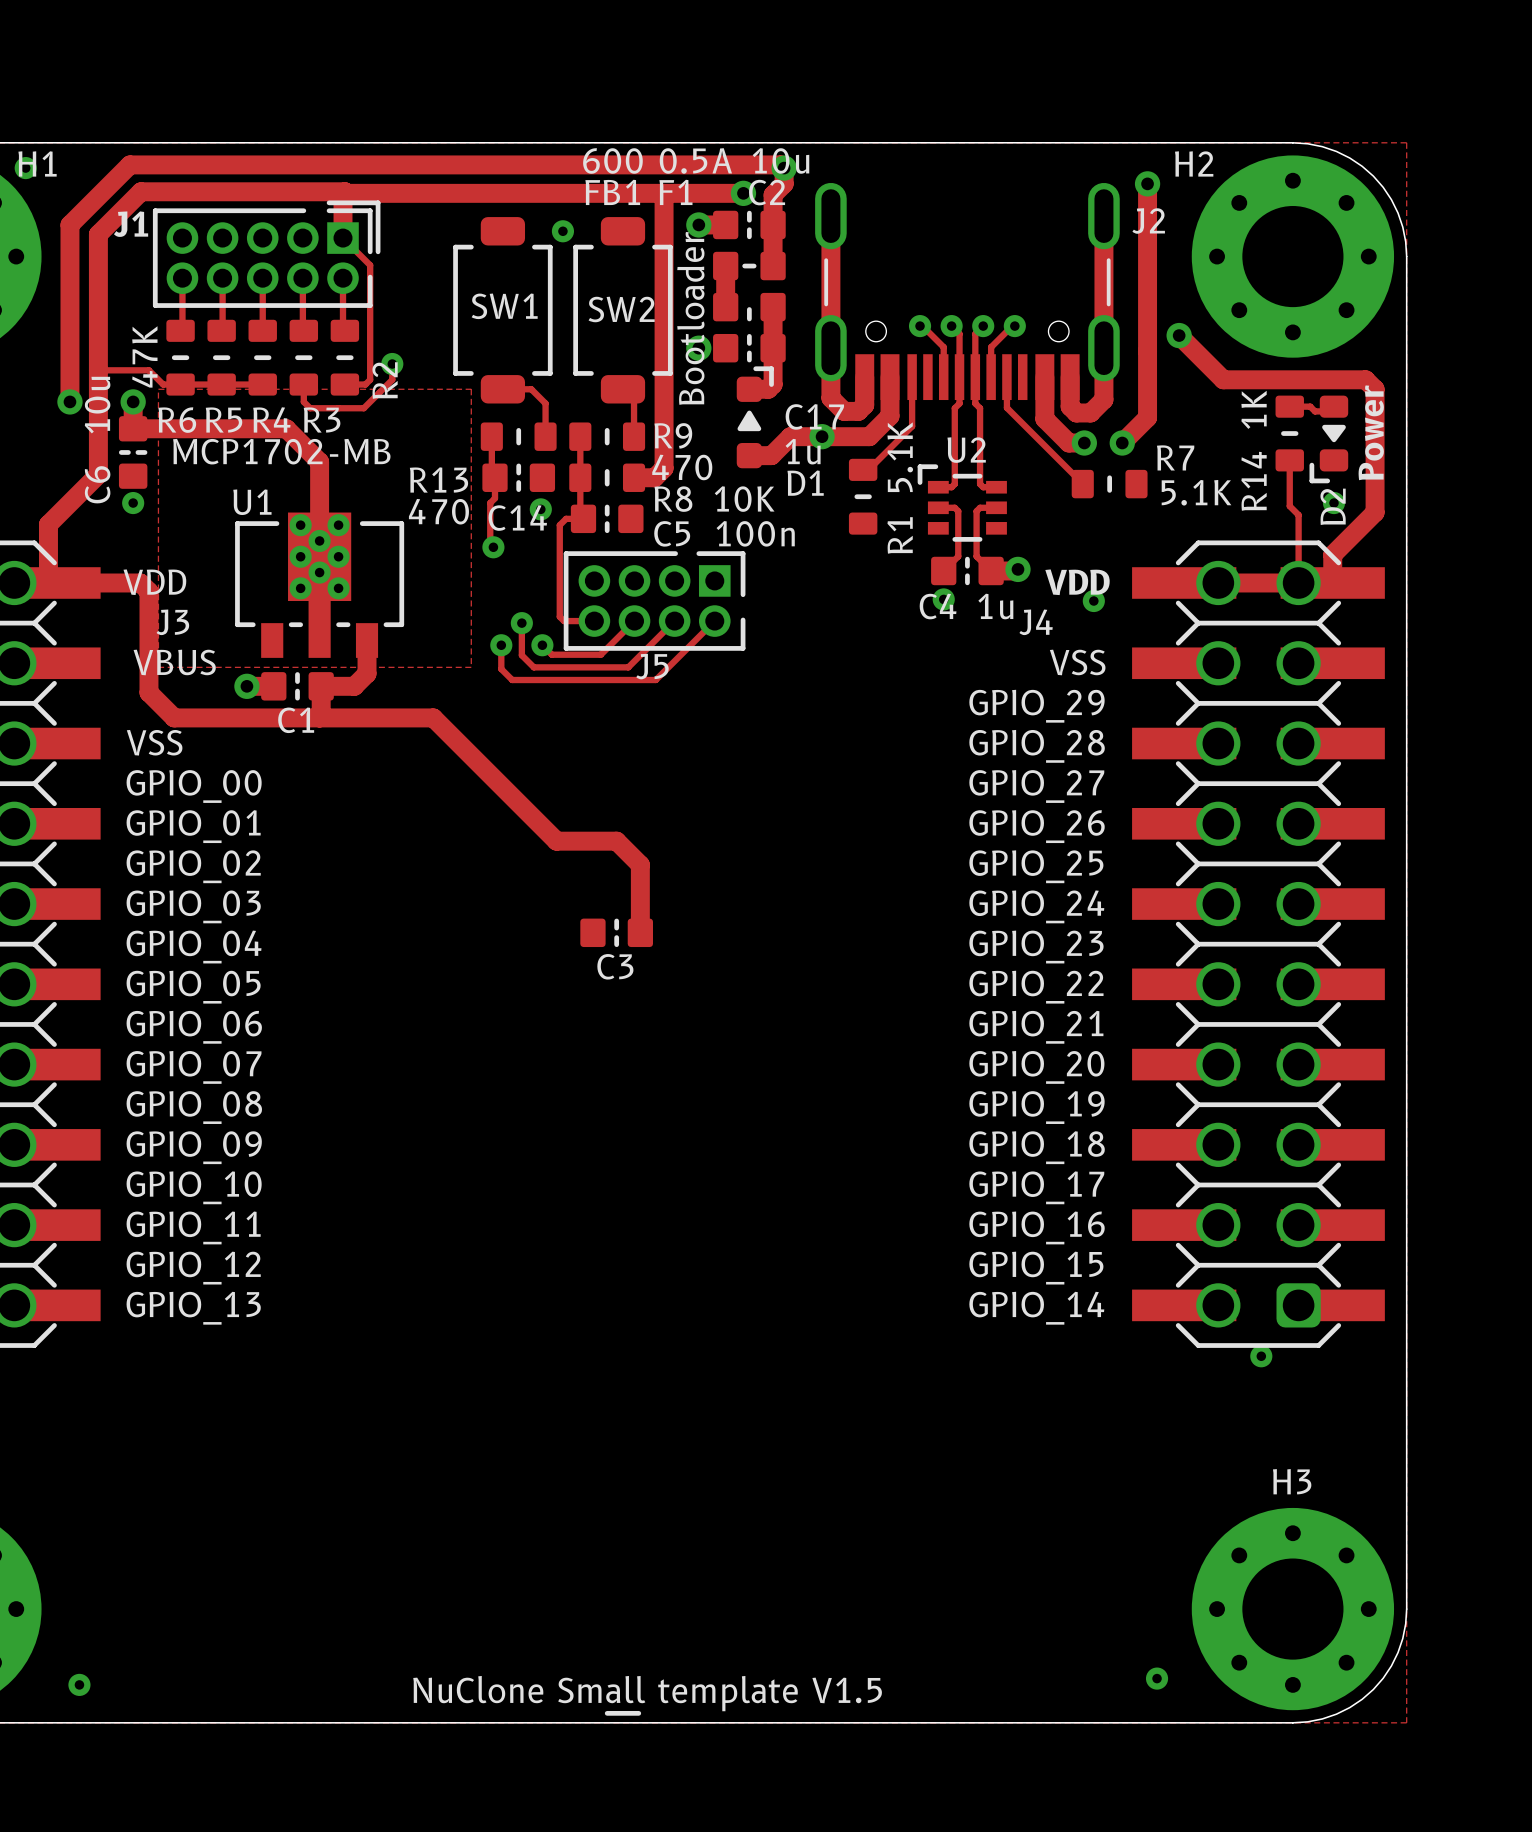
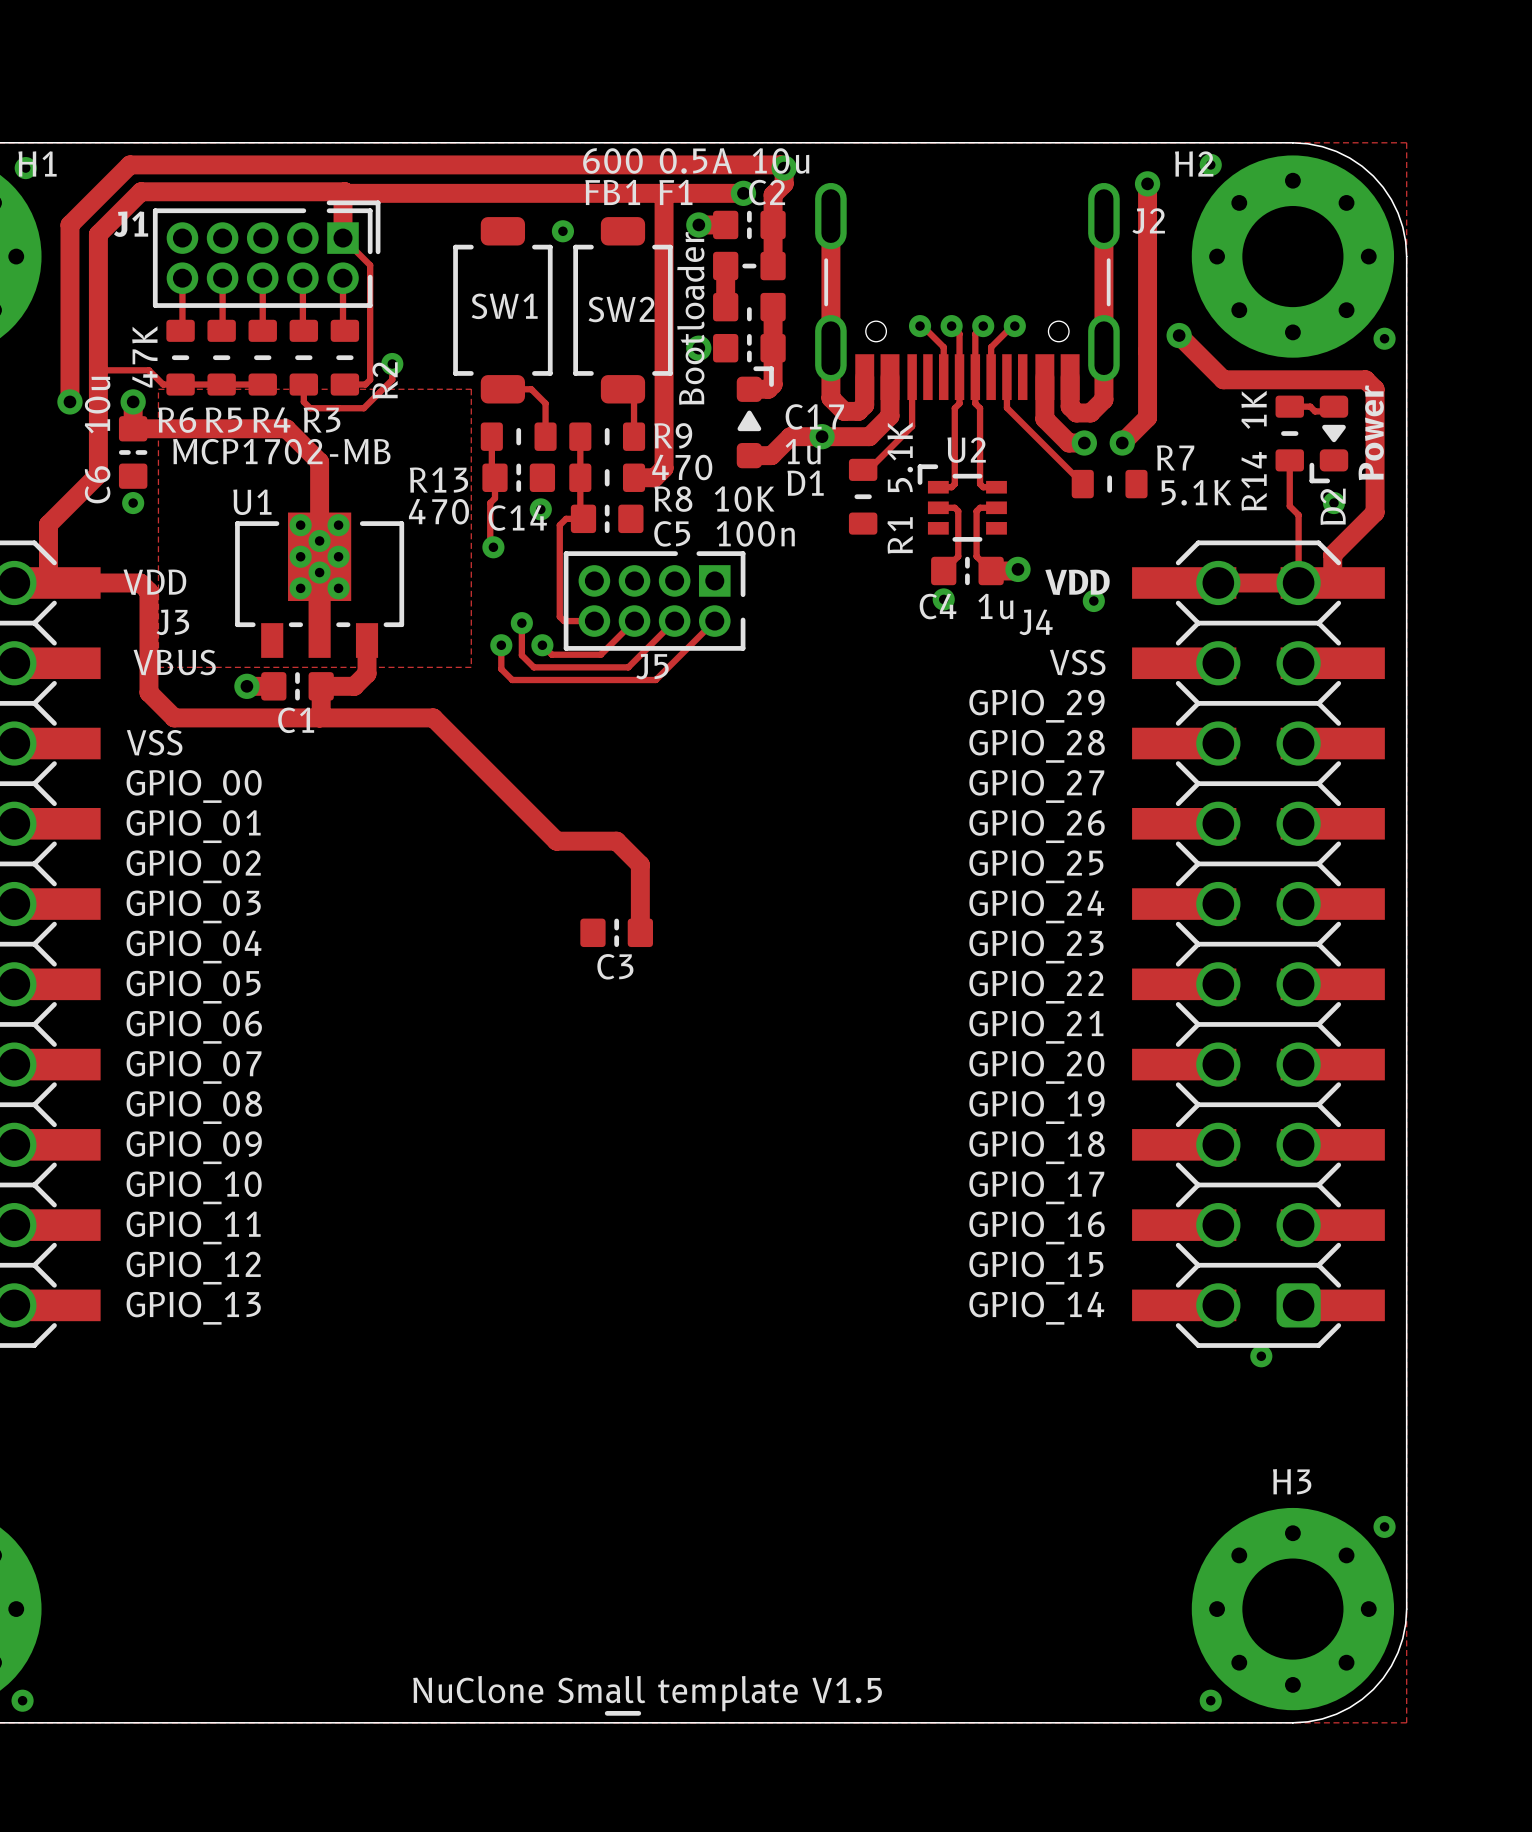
via: none -> (1210, 164)
via: none -> (1384, 338)
via: none -> (1384, 1526)
via position: (1157, 1678) -> (1210, 1700)
via position: (79, 1684) -> (22, 1700)

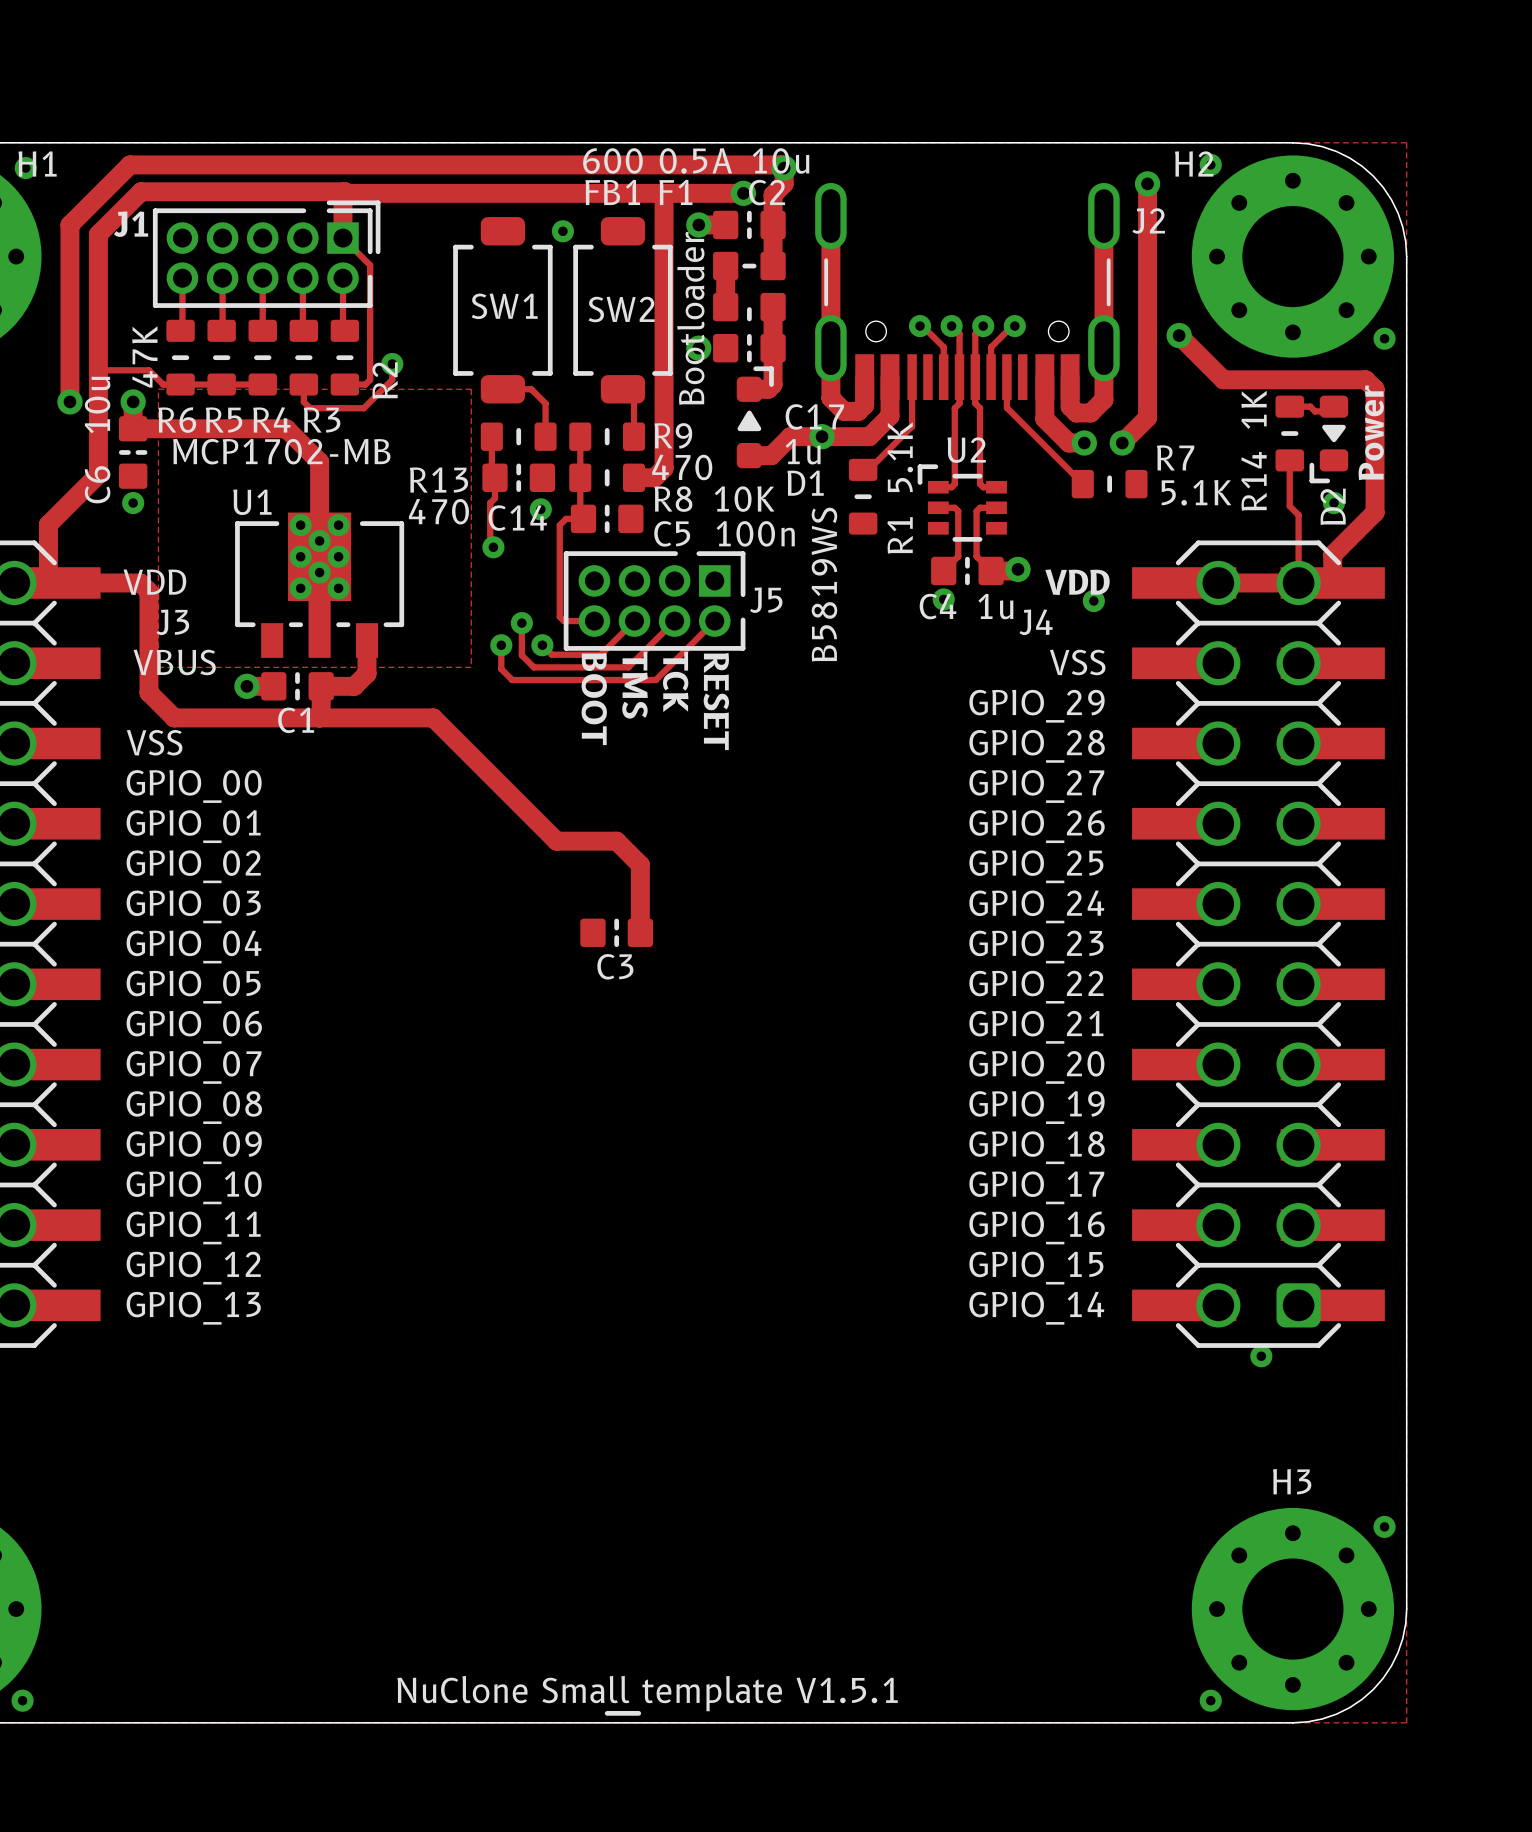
D1 value: none -> B5819WS (824, 584)
J5 name position: J5 (652, 666) -> J5 (766, 600)
text: none -> TCK (675, 681)
text: none -> TMS (635, 685)
text: none -> BOOT (594, 699)
text: none -> RESET (716, 701)
drawing shape: [413, 1675, 882, 1716] -> [397, 1675, 898, 1716]

